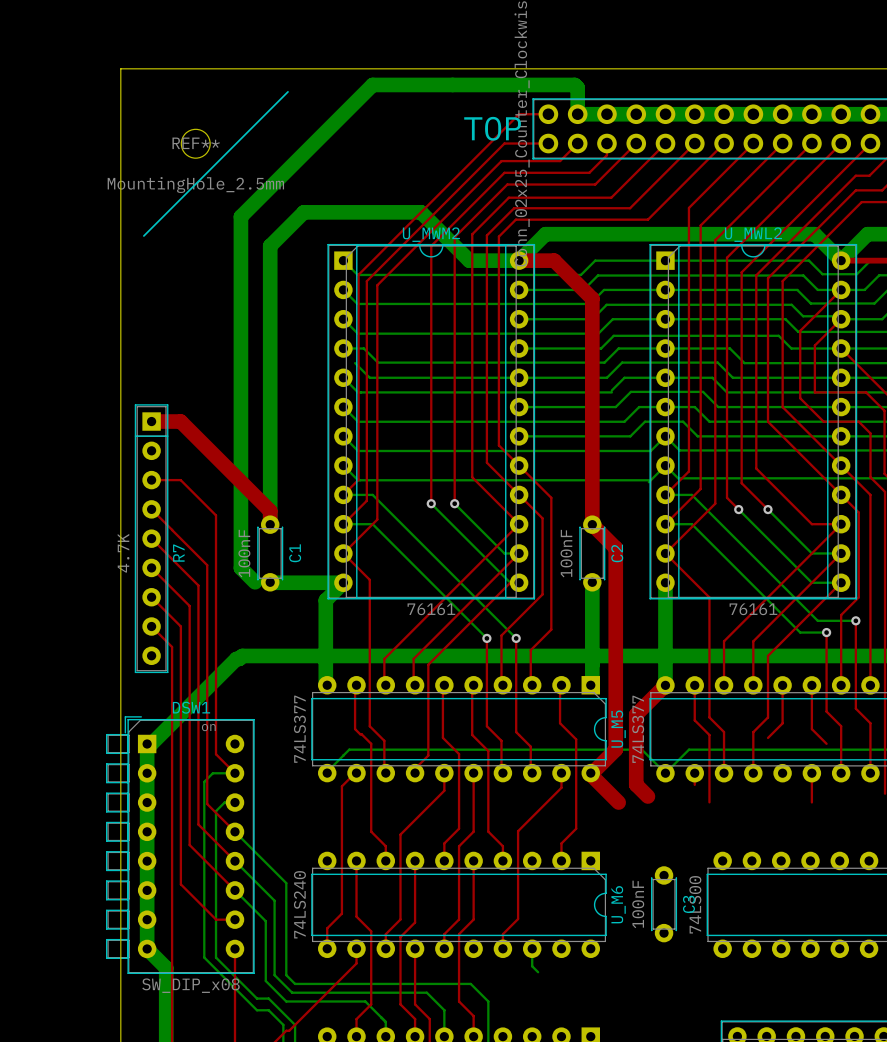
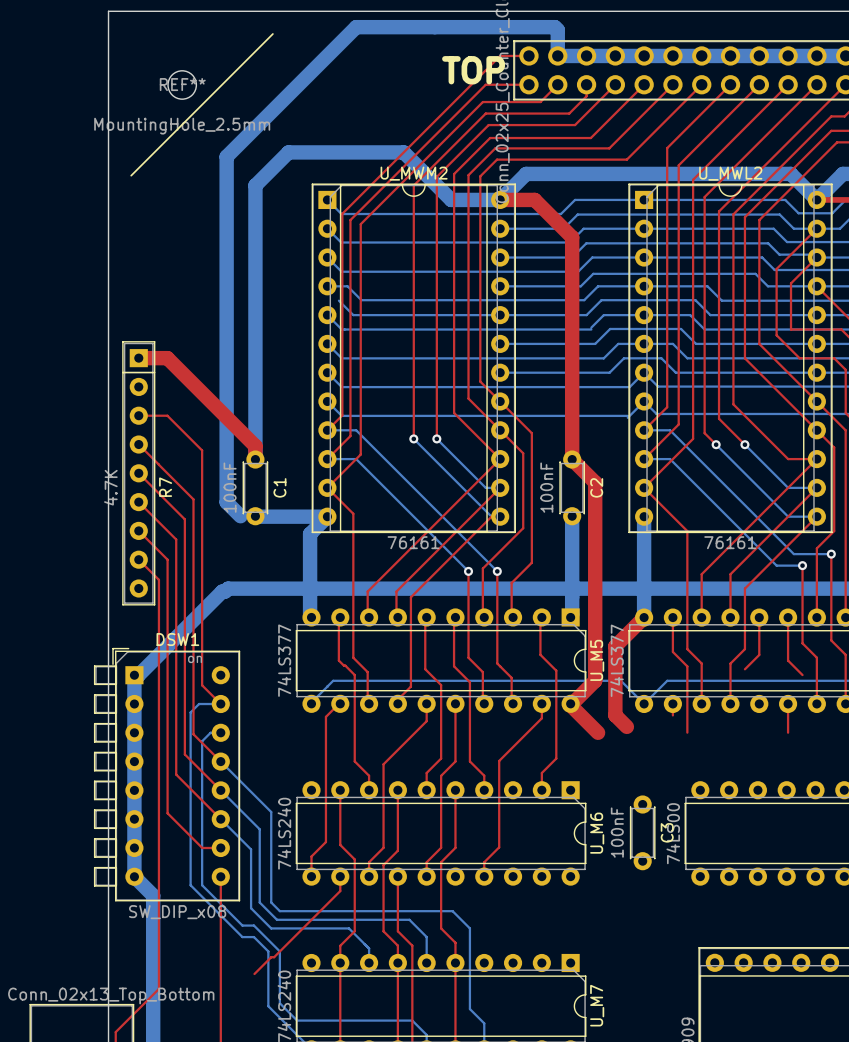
bottom track: (532, 948) (532, 966) (538, 972) -> none

